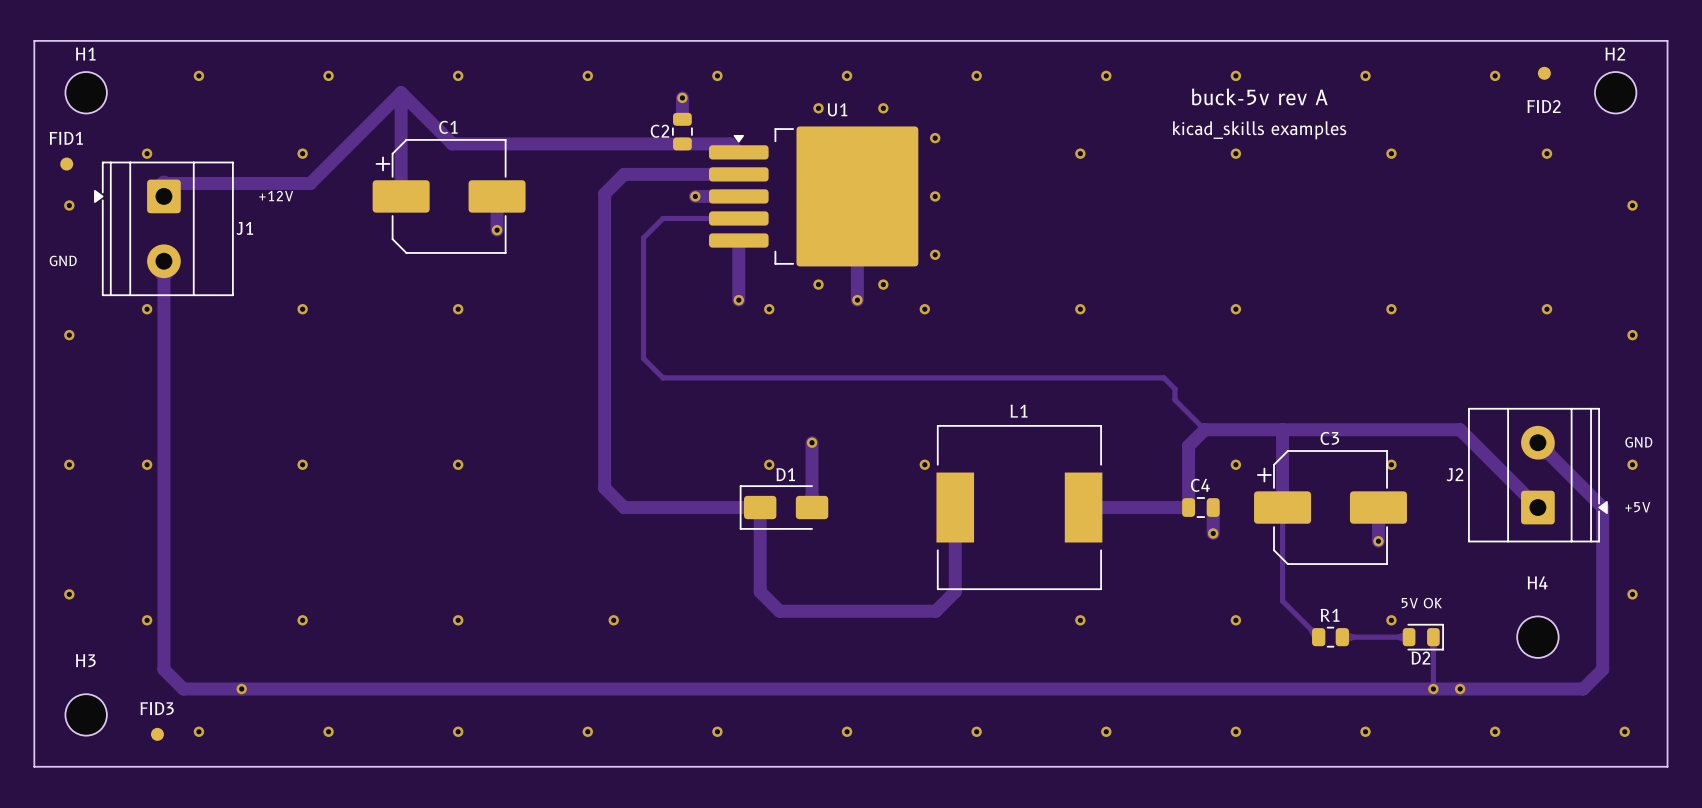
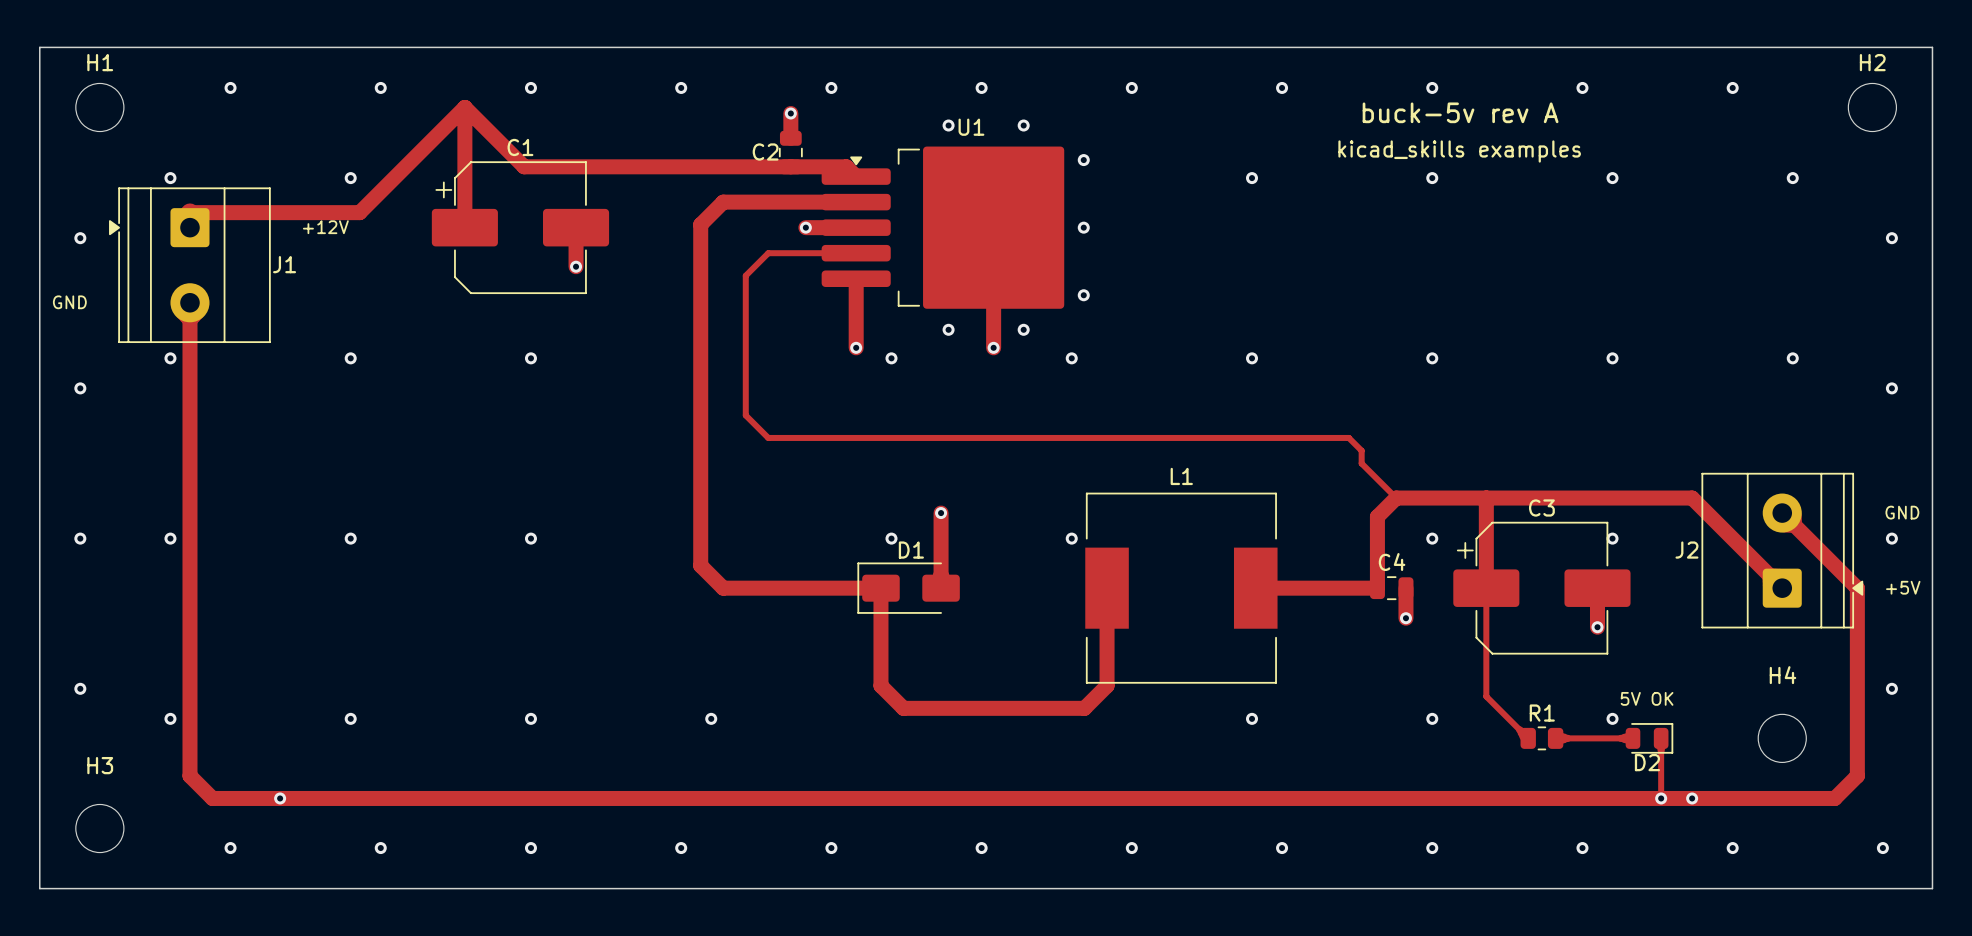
FID2: (1544, 73) -> none
FID1: (66, 164) -> none
FID3: (157, 734) -> none

